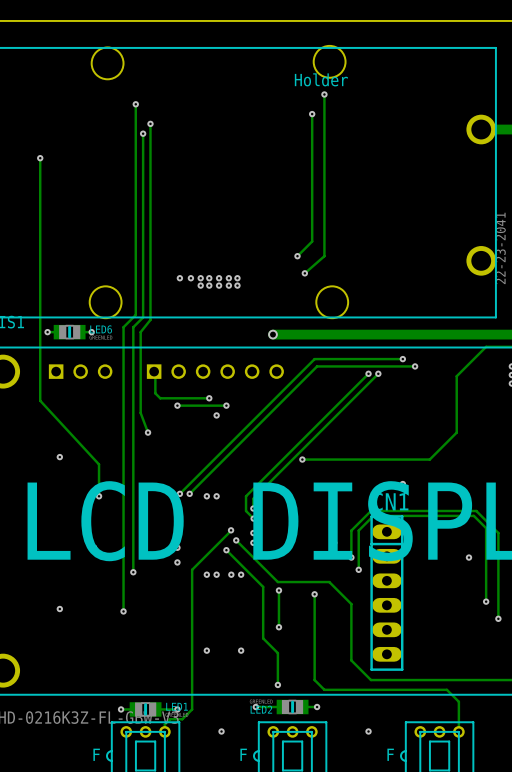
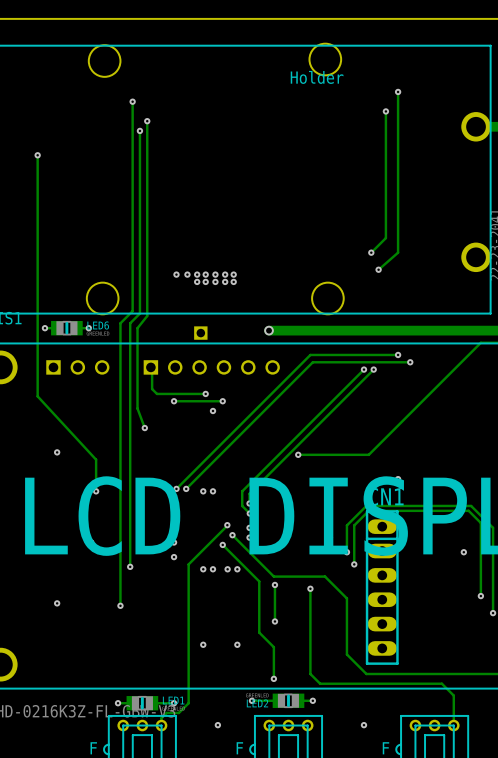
track: (324, 94) (324, 256) (304, 273) -> (398, 91) (398, 252) (378, 269)
via: (324, 94) -> none
via: none -> (398, 91)
track: (312, 114) (312, 241) (297, 256) -> (385, 111) (385, 238) (371, 252)
via: (312, 114) -> none
via: none -> (385, 111)
via: (297, 256) -> none
via: none -> (371, 252)
via: (304, 273) -> none
via: none -> (378, 269)
part: none -> (200, 333)
track: (456, 376) (456, 432) (429, 459) (373, 459) -> (451, 372) (368, 454)

